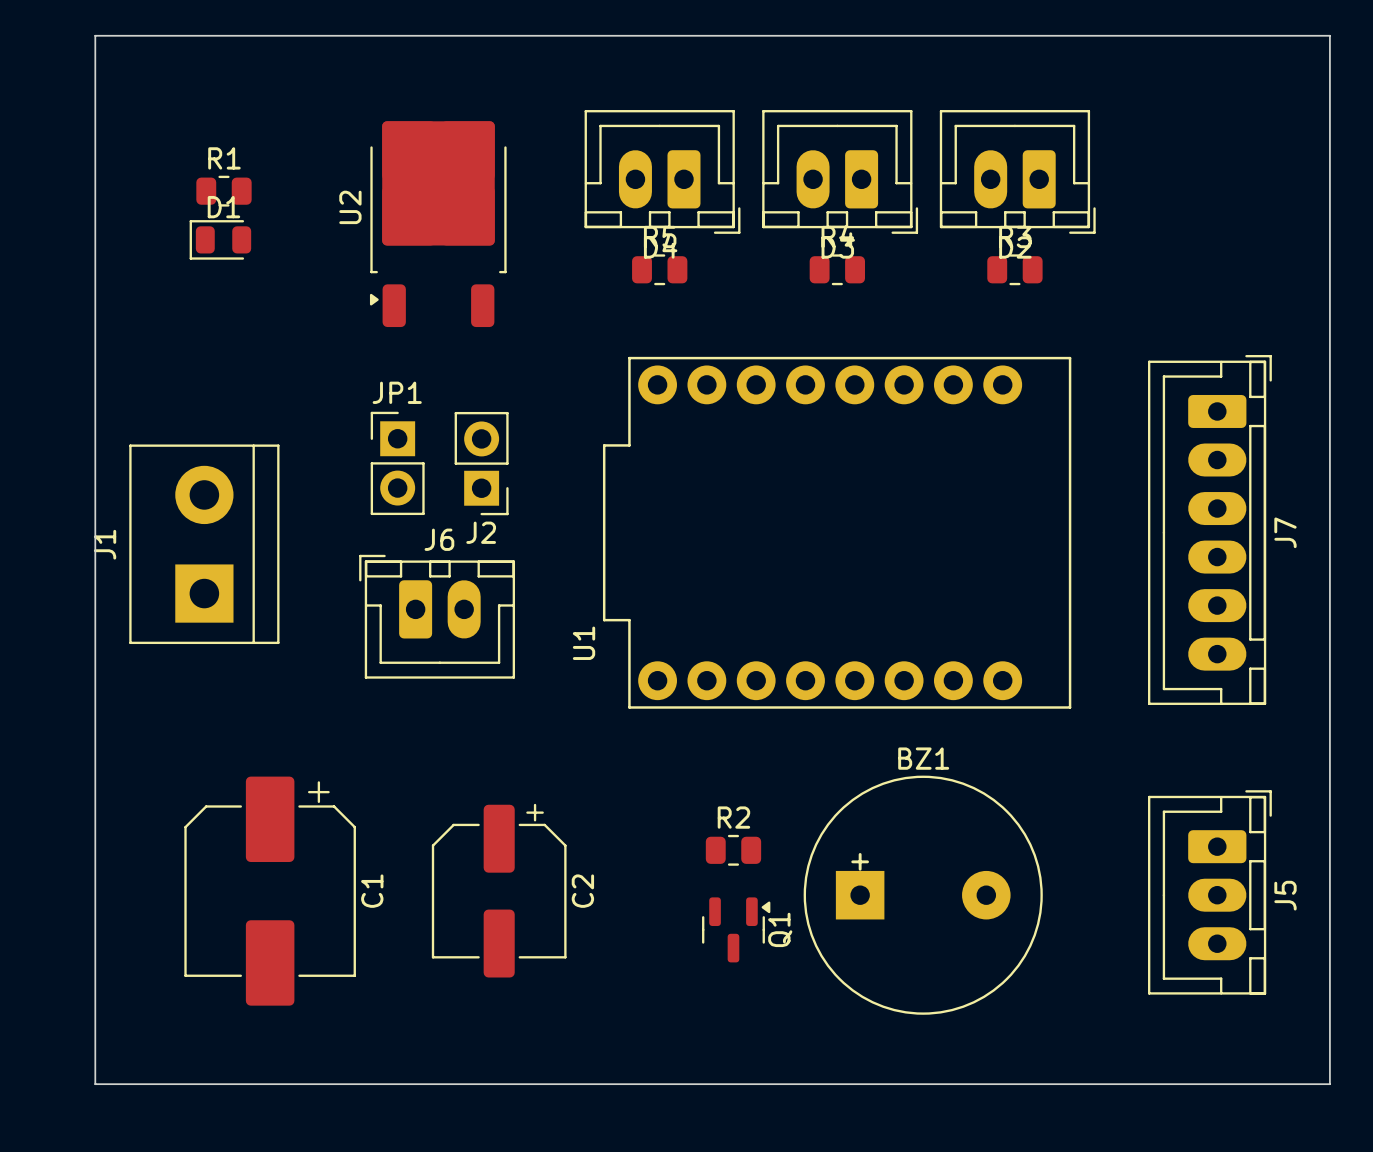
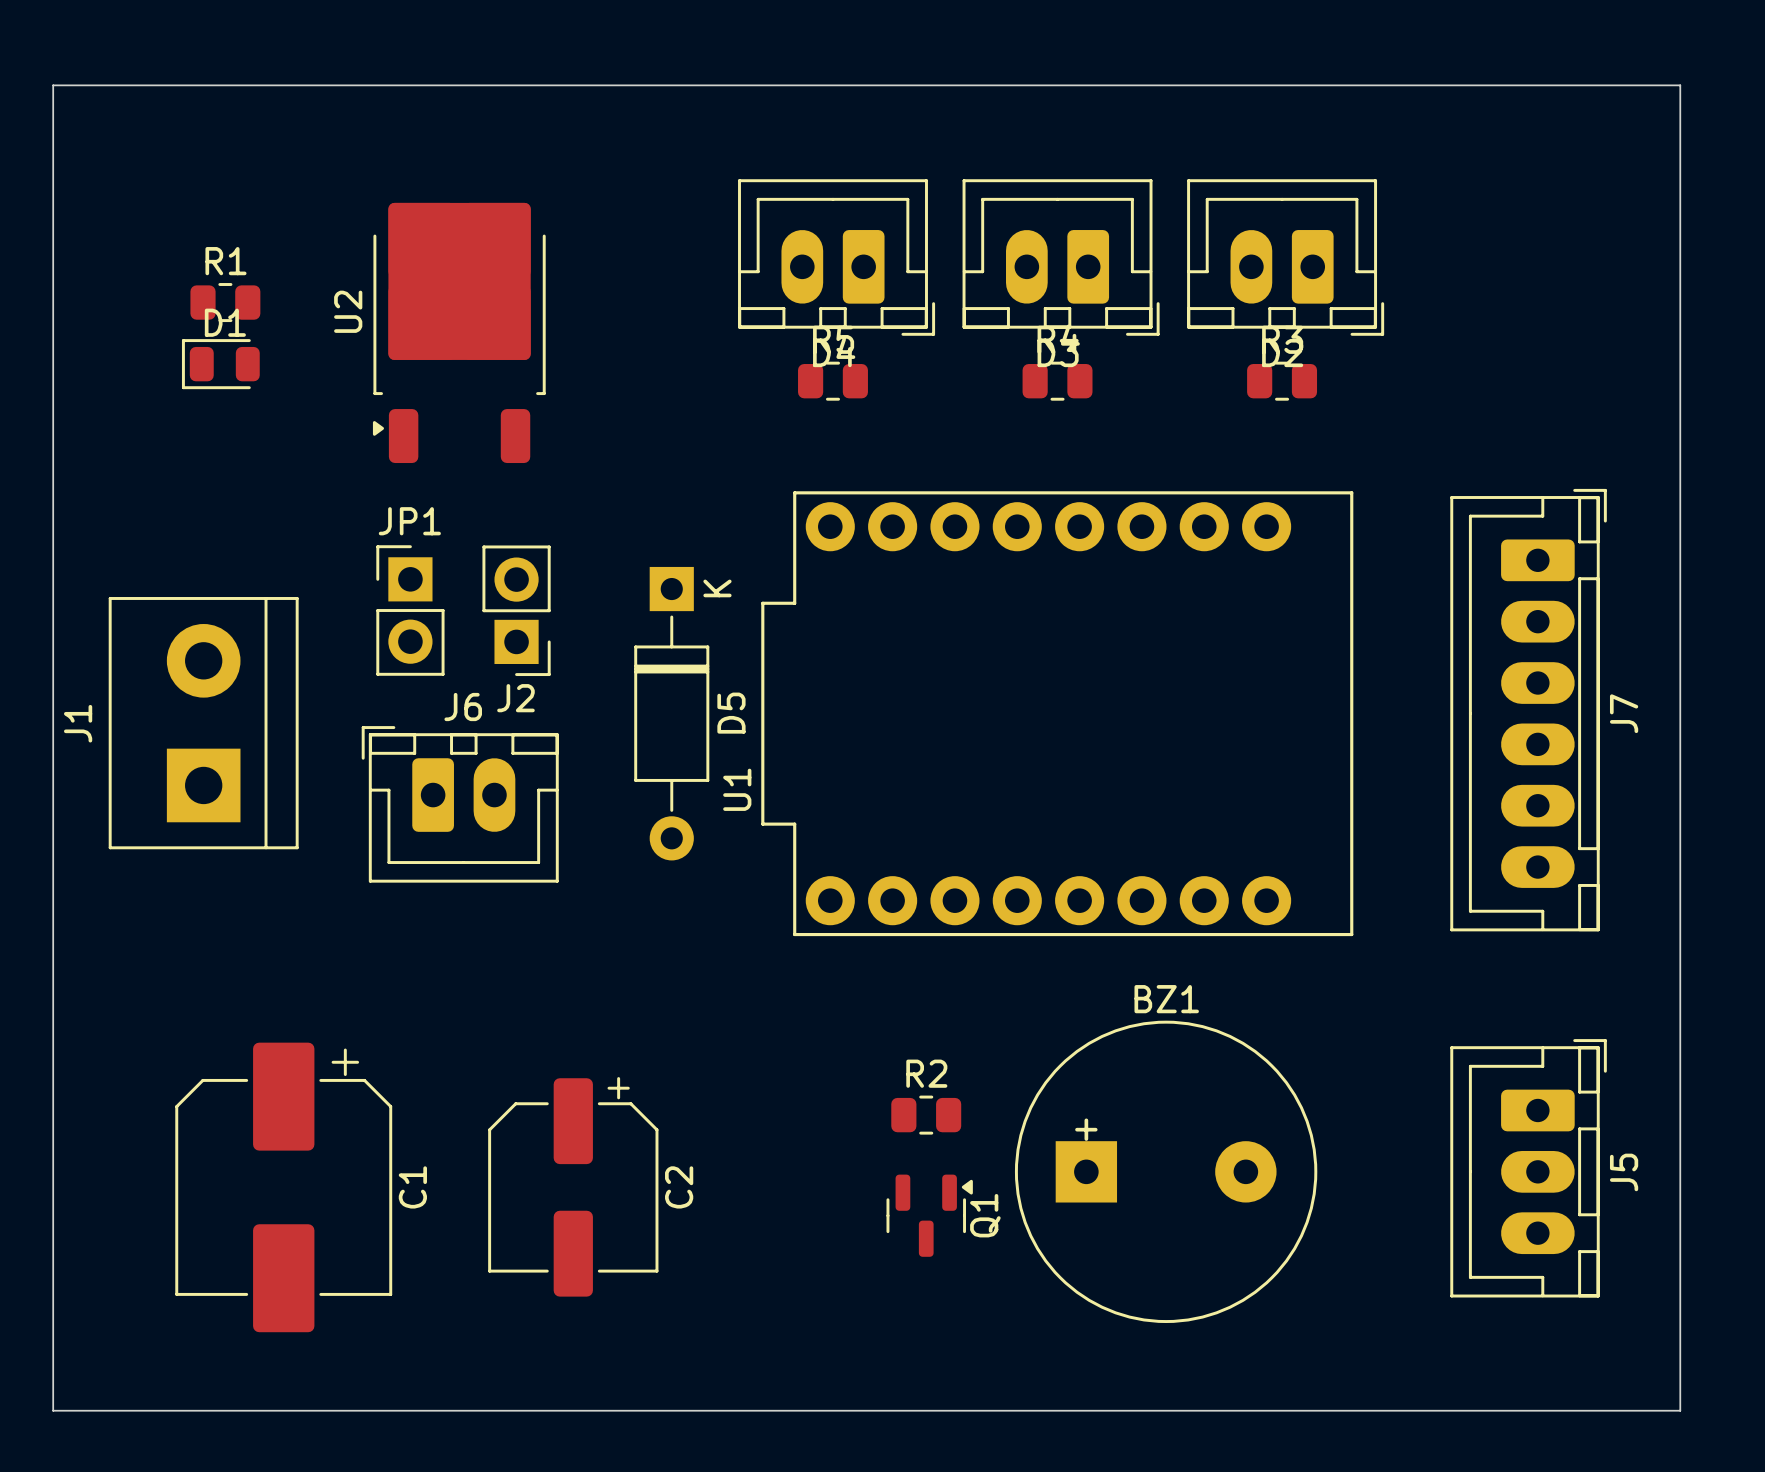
board edge: (95, 35) (95, 1084) -> (119, 85) (53, 85) (53, 1410) (119, 1410)
R1 position: (223, 191) -> (225, 302)
U2 position: (438, 224) -> (459, 332)
D1 position: (220, 239) -> (220, 364)
JP1 position: (397, 463) -> (410, 610)
J2 position: (481, 463) -> (516, 610)
D5: none -> (671, 713)
J1 position: (204, 544) -> (203, 723)
J6 position: (437, 616) -> (460, 804)
U1 name position: U1 (584, 643) -> U1 (737, 789)
C2 position: (499, 890) -> (573, 1186)
C1 position: (270, 891) -> (283, 1187)

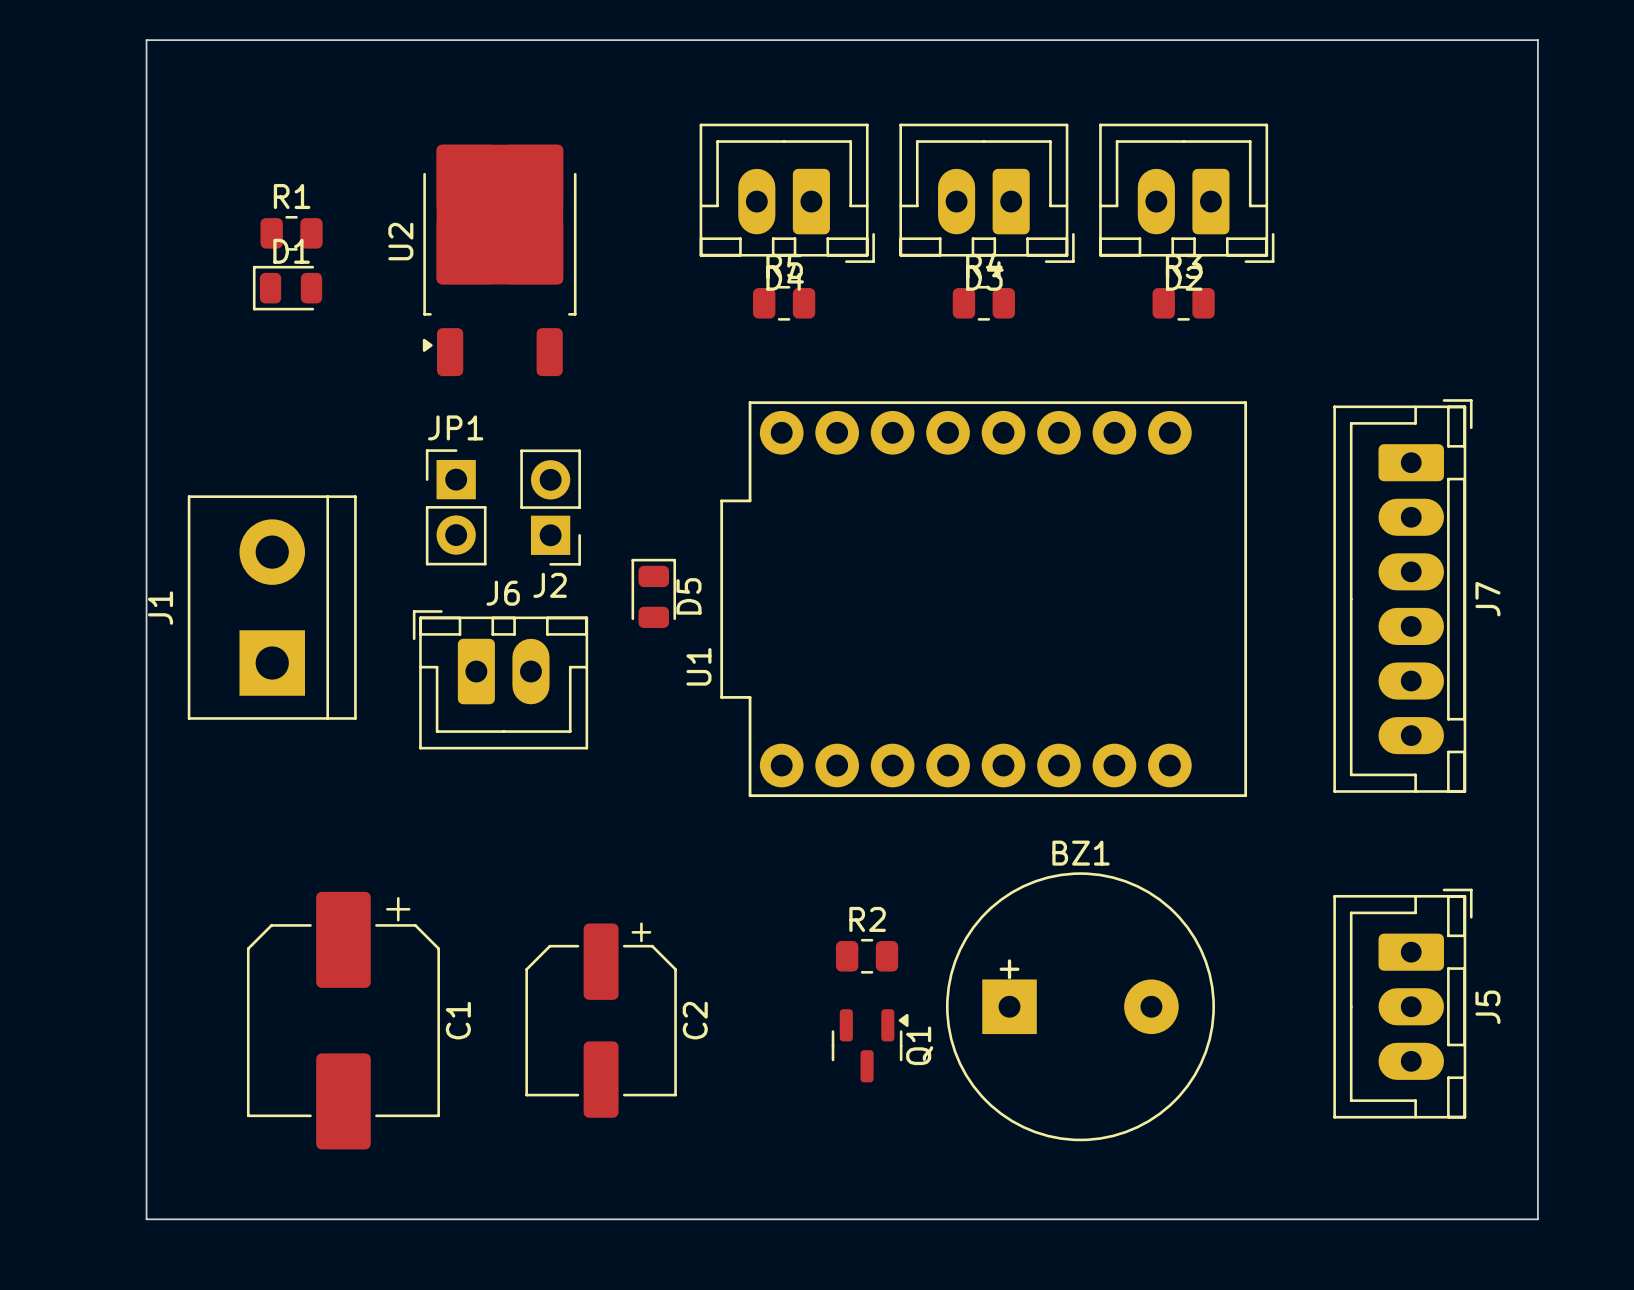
board edge: (116, 85) (53, 85) (53, 1410) (116, 1410) -> (146, 40) (146, 1219)
R1 position: (225, 302) -> (291, 233)
U2 position: (459, 332) -> (499, 260)
D1 position: (220, 364) -> (287, 288)
D5 footprint: [634, 566, 710, 861] -> [631, 558, 677, 629]
JP1 position: (410, 610) -> (456, 507)
J2 position: (516, 610) -> (550, 507)
J1 position: (203, 723) -> (272, 607)
J6 position: (460, 804) -> (500, 679)
C2 position: (573, 1186) -> (601, 1020)
C1 position: (283, 1187) -> (343, 1020)

